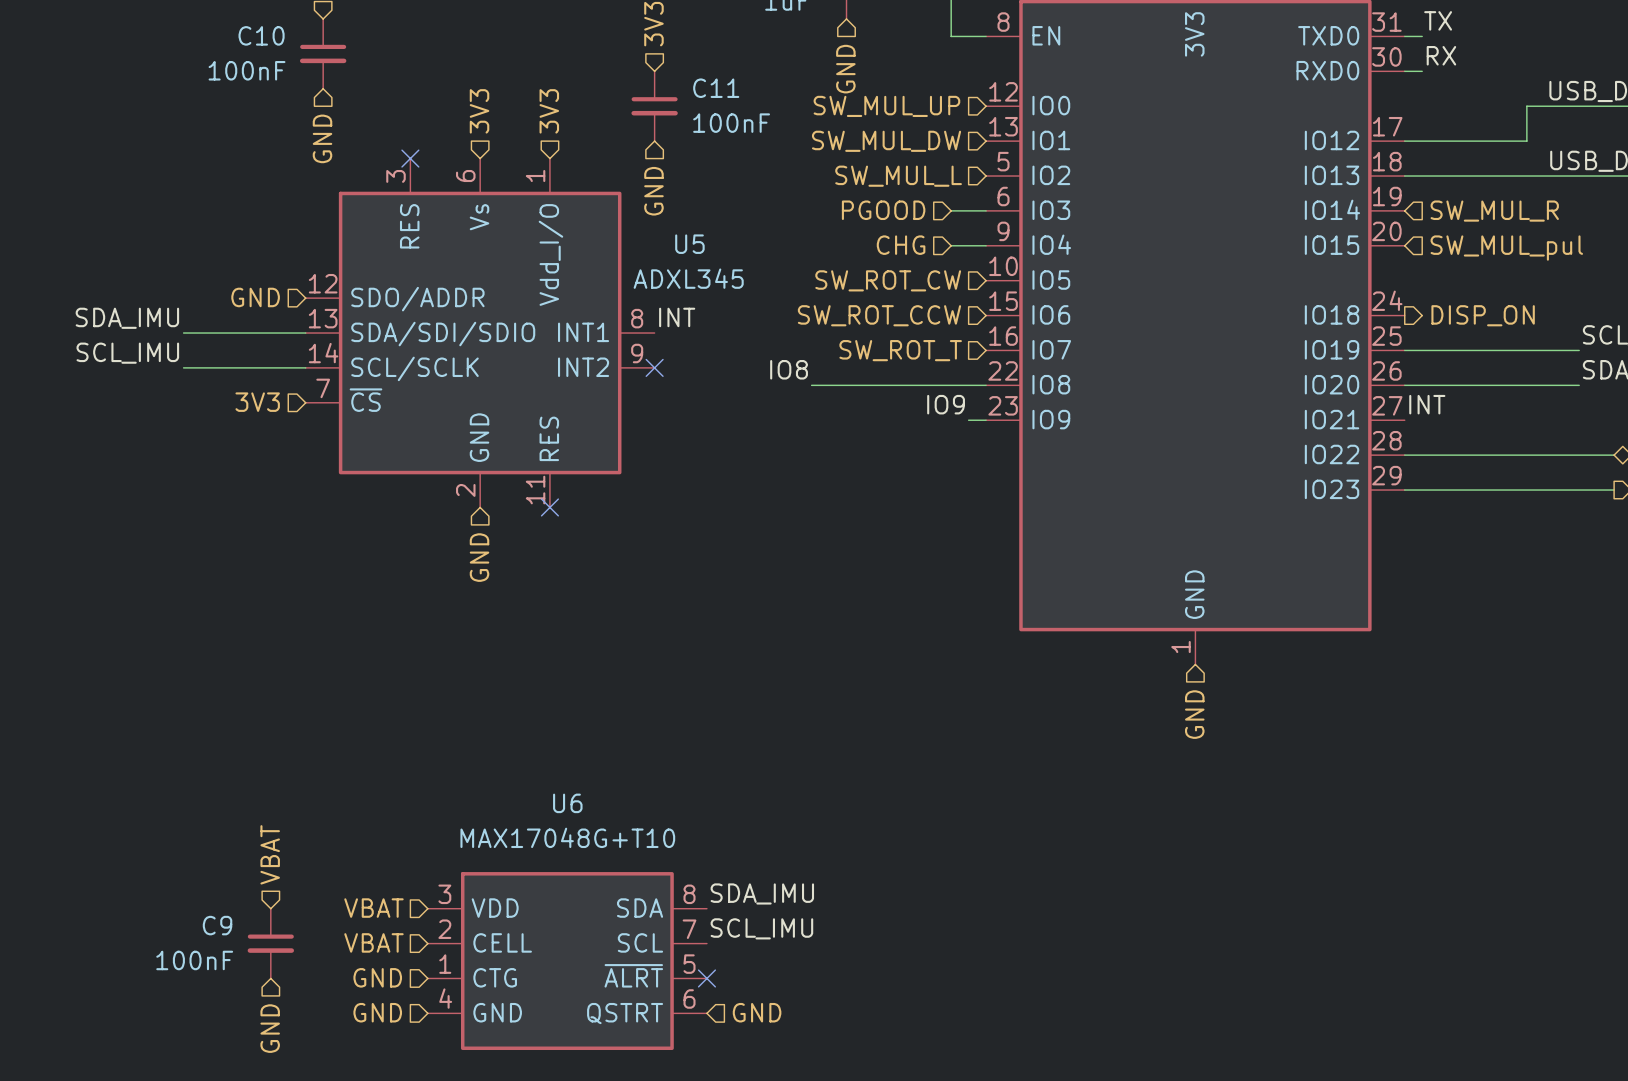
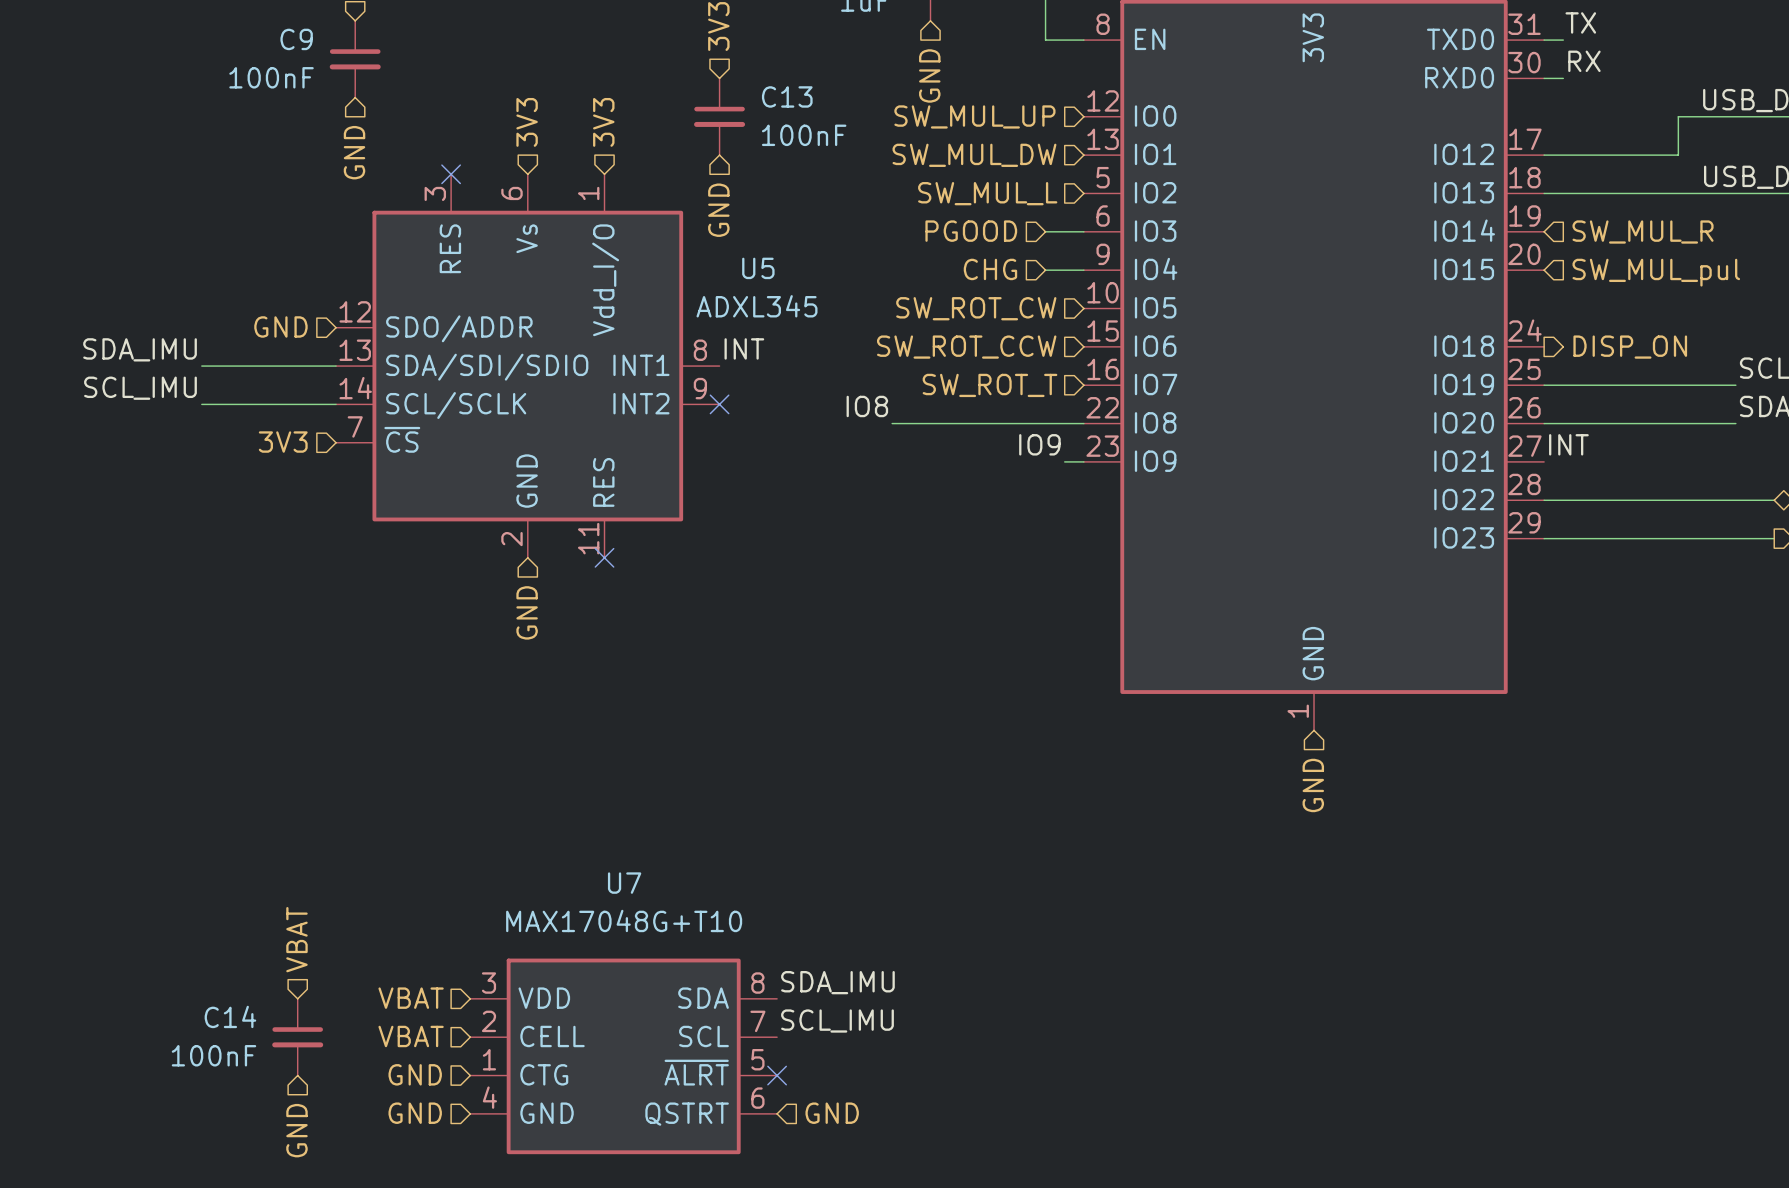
C10 name: C10 (261, 35) -> C9 (296, 39)
C11 name: C11 (716, 88) -> C13 (787, 96)
U6 name: U6 (567, 803) -> U7 (624, 883)
C9 name: C9 (217, 925) -> C14 (230, 1016)

